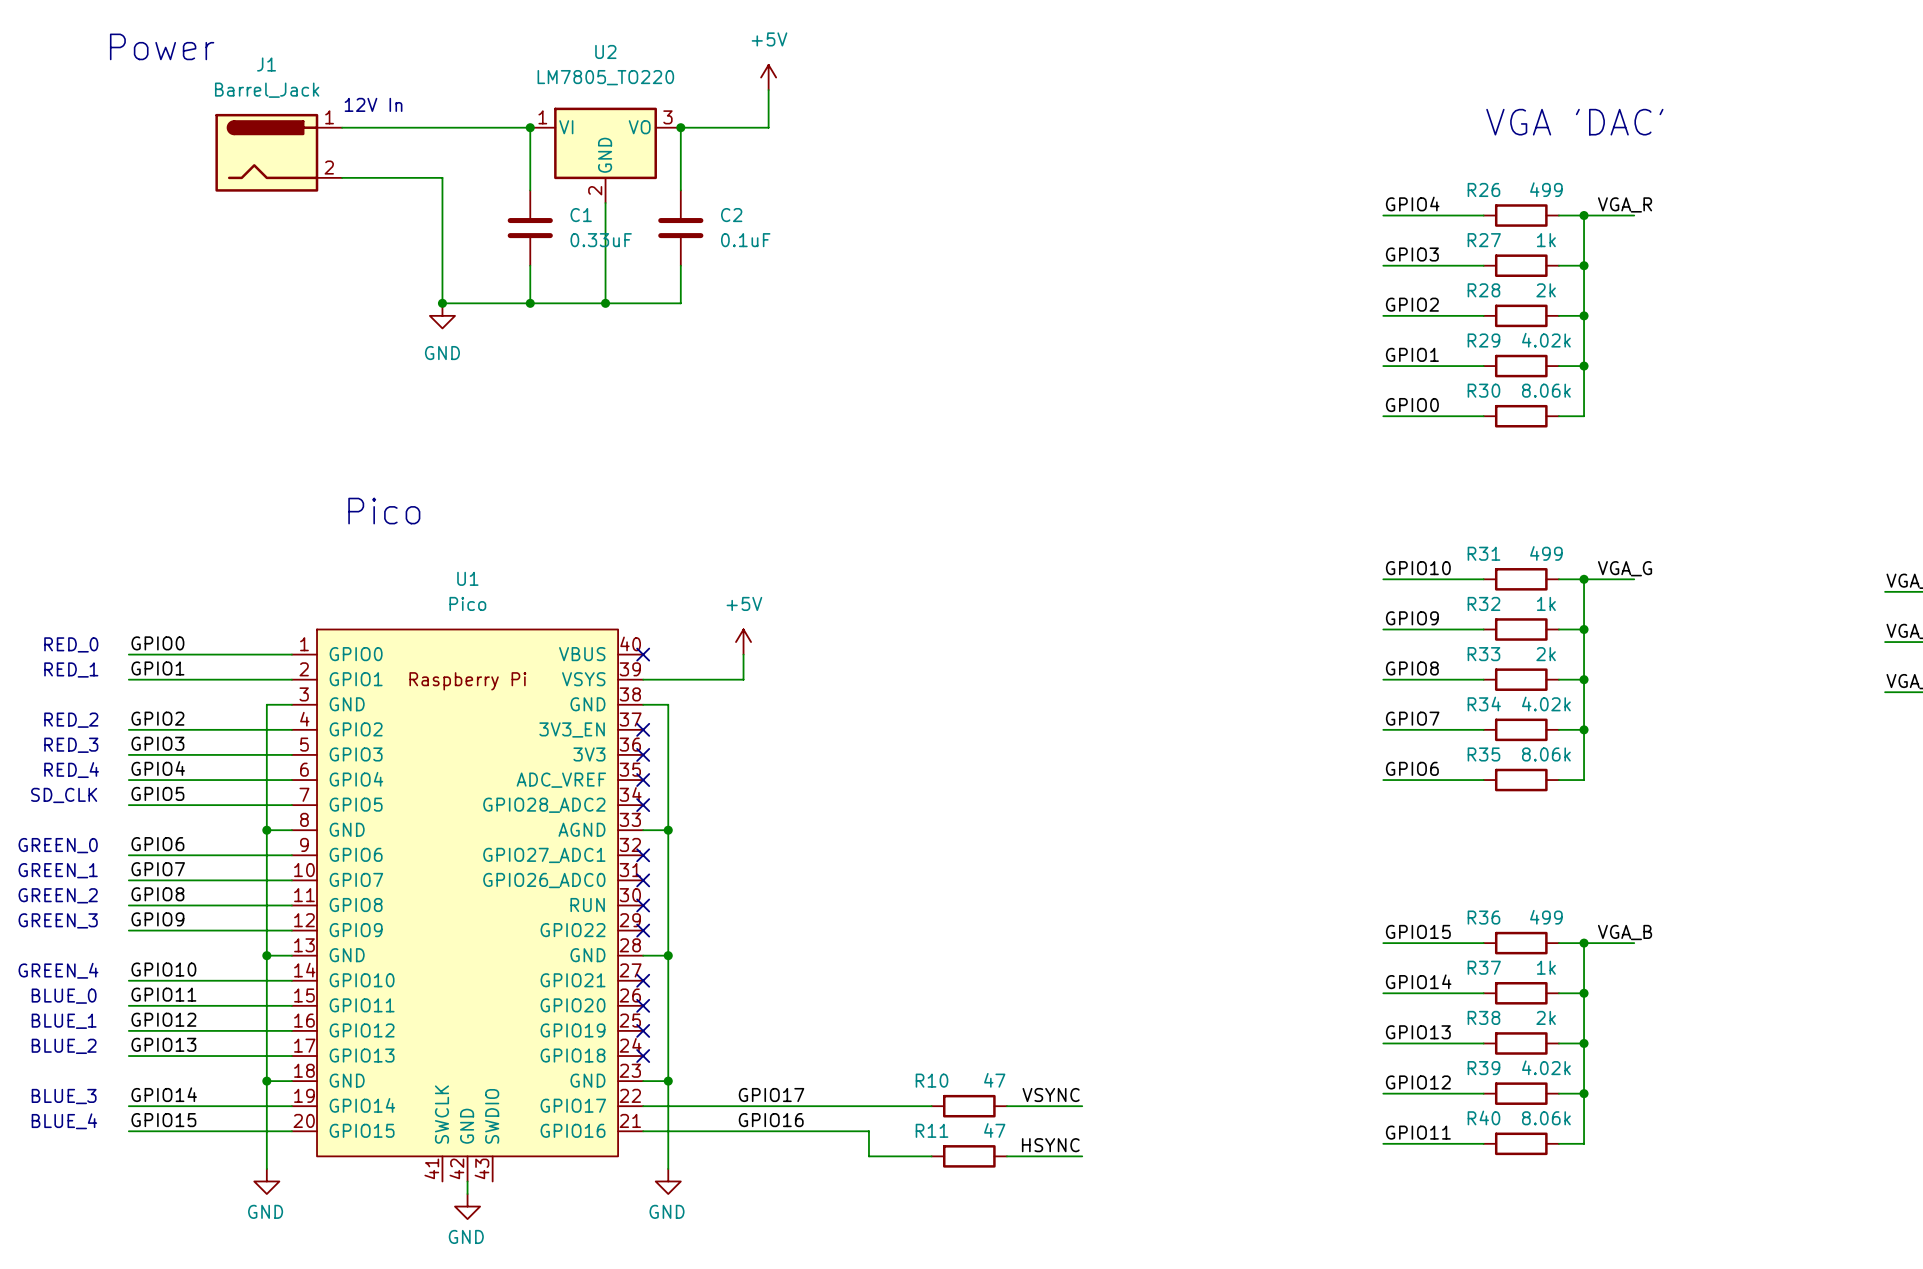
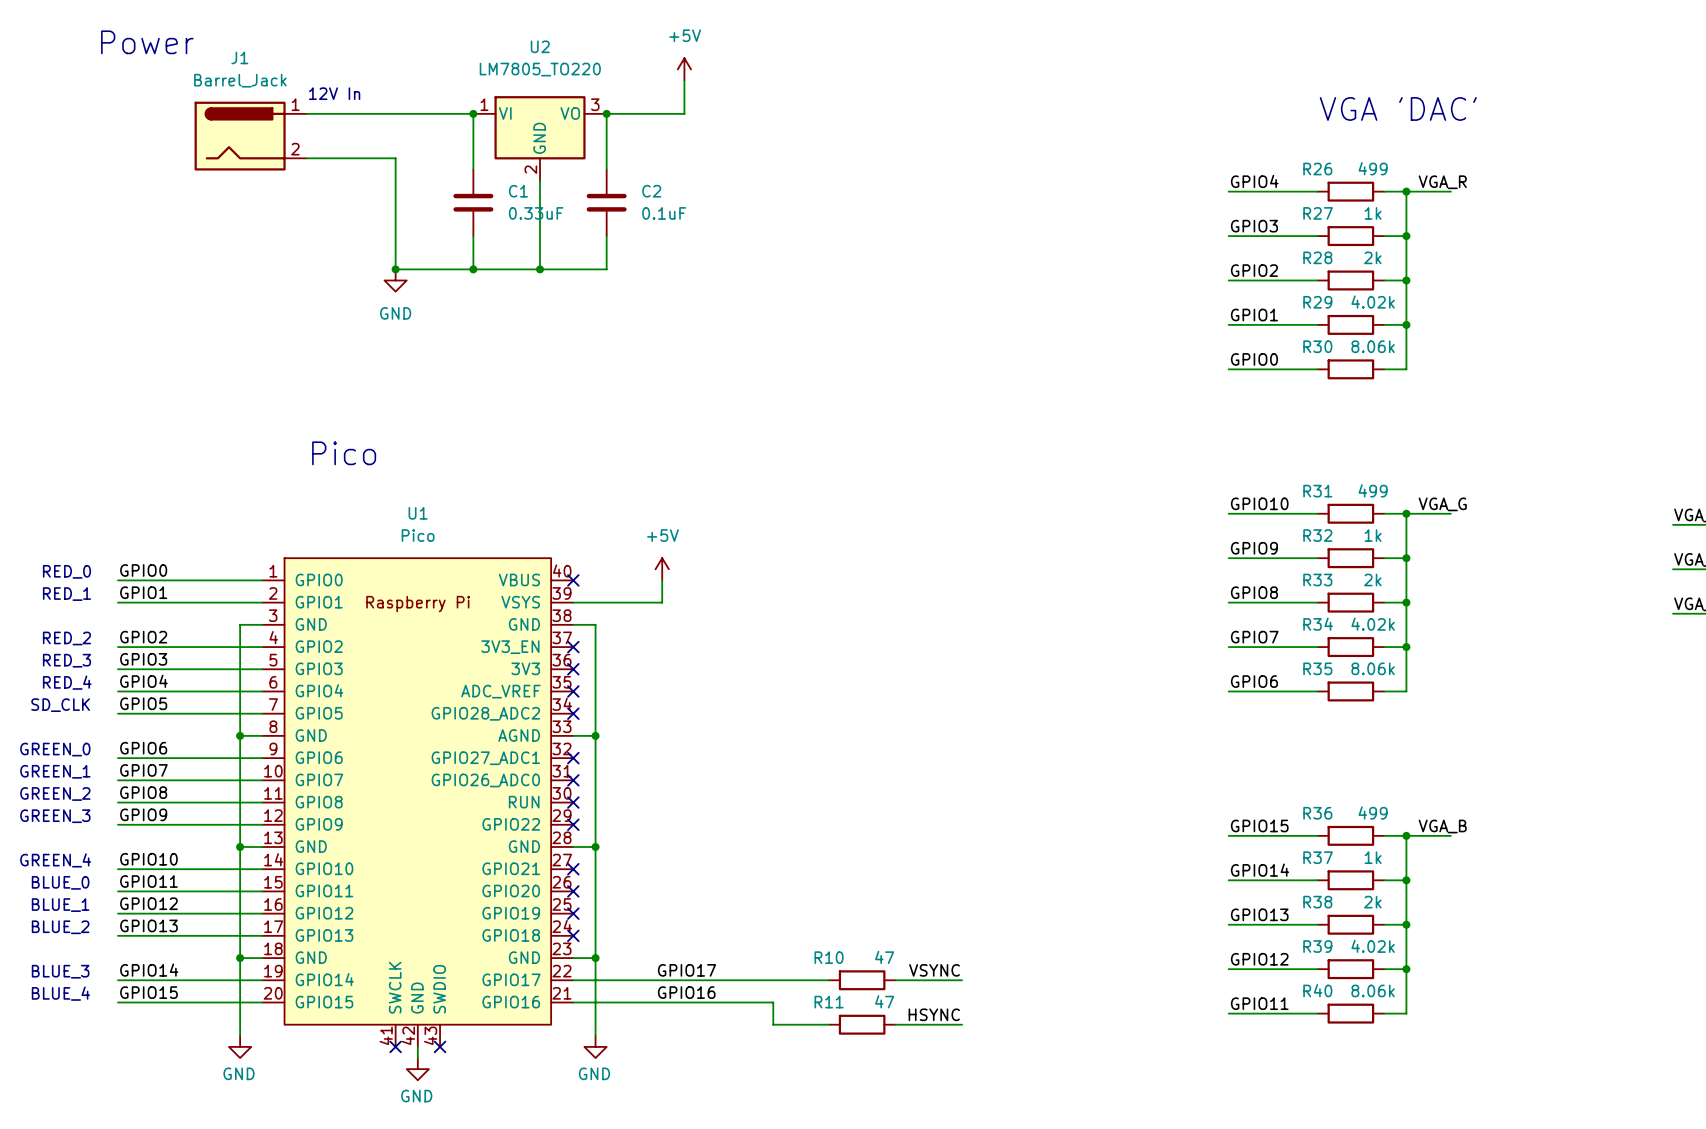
no-connect mark: none -> (395, 1046)
no-connect mark: none -> (440, 1046)

